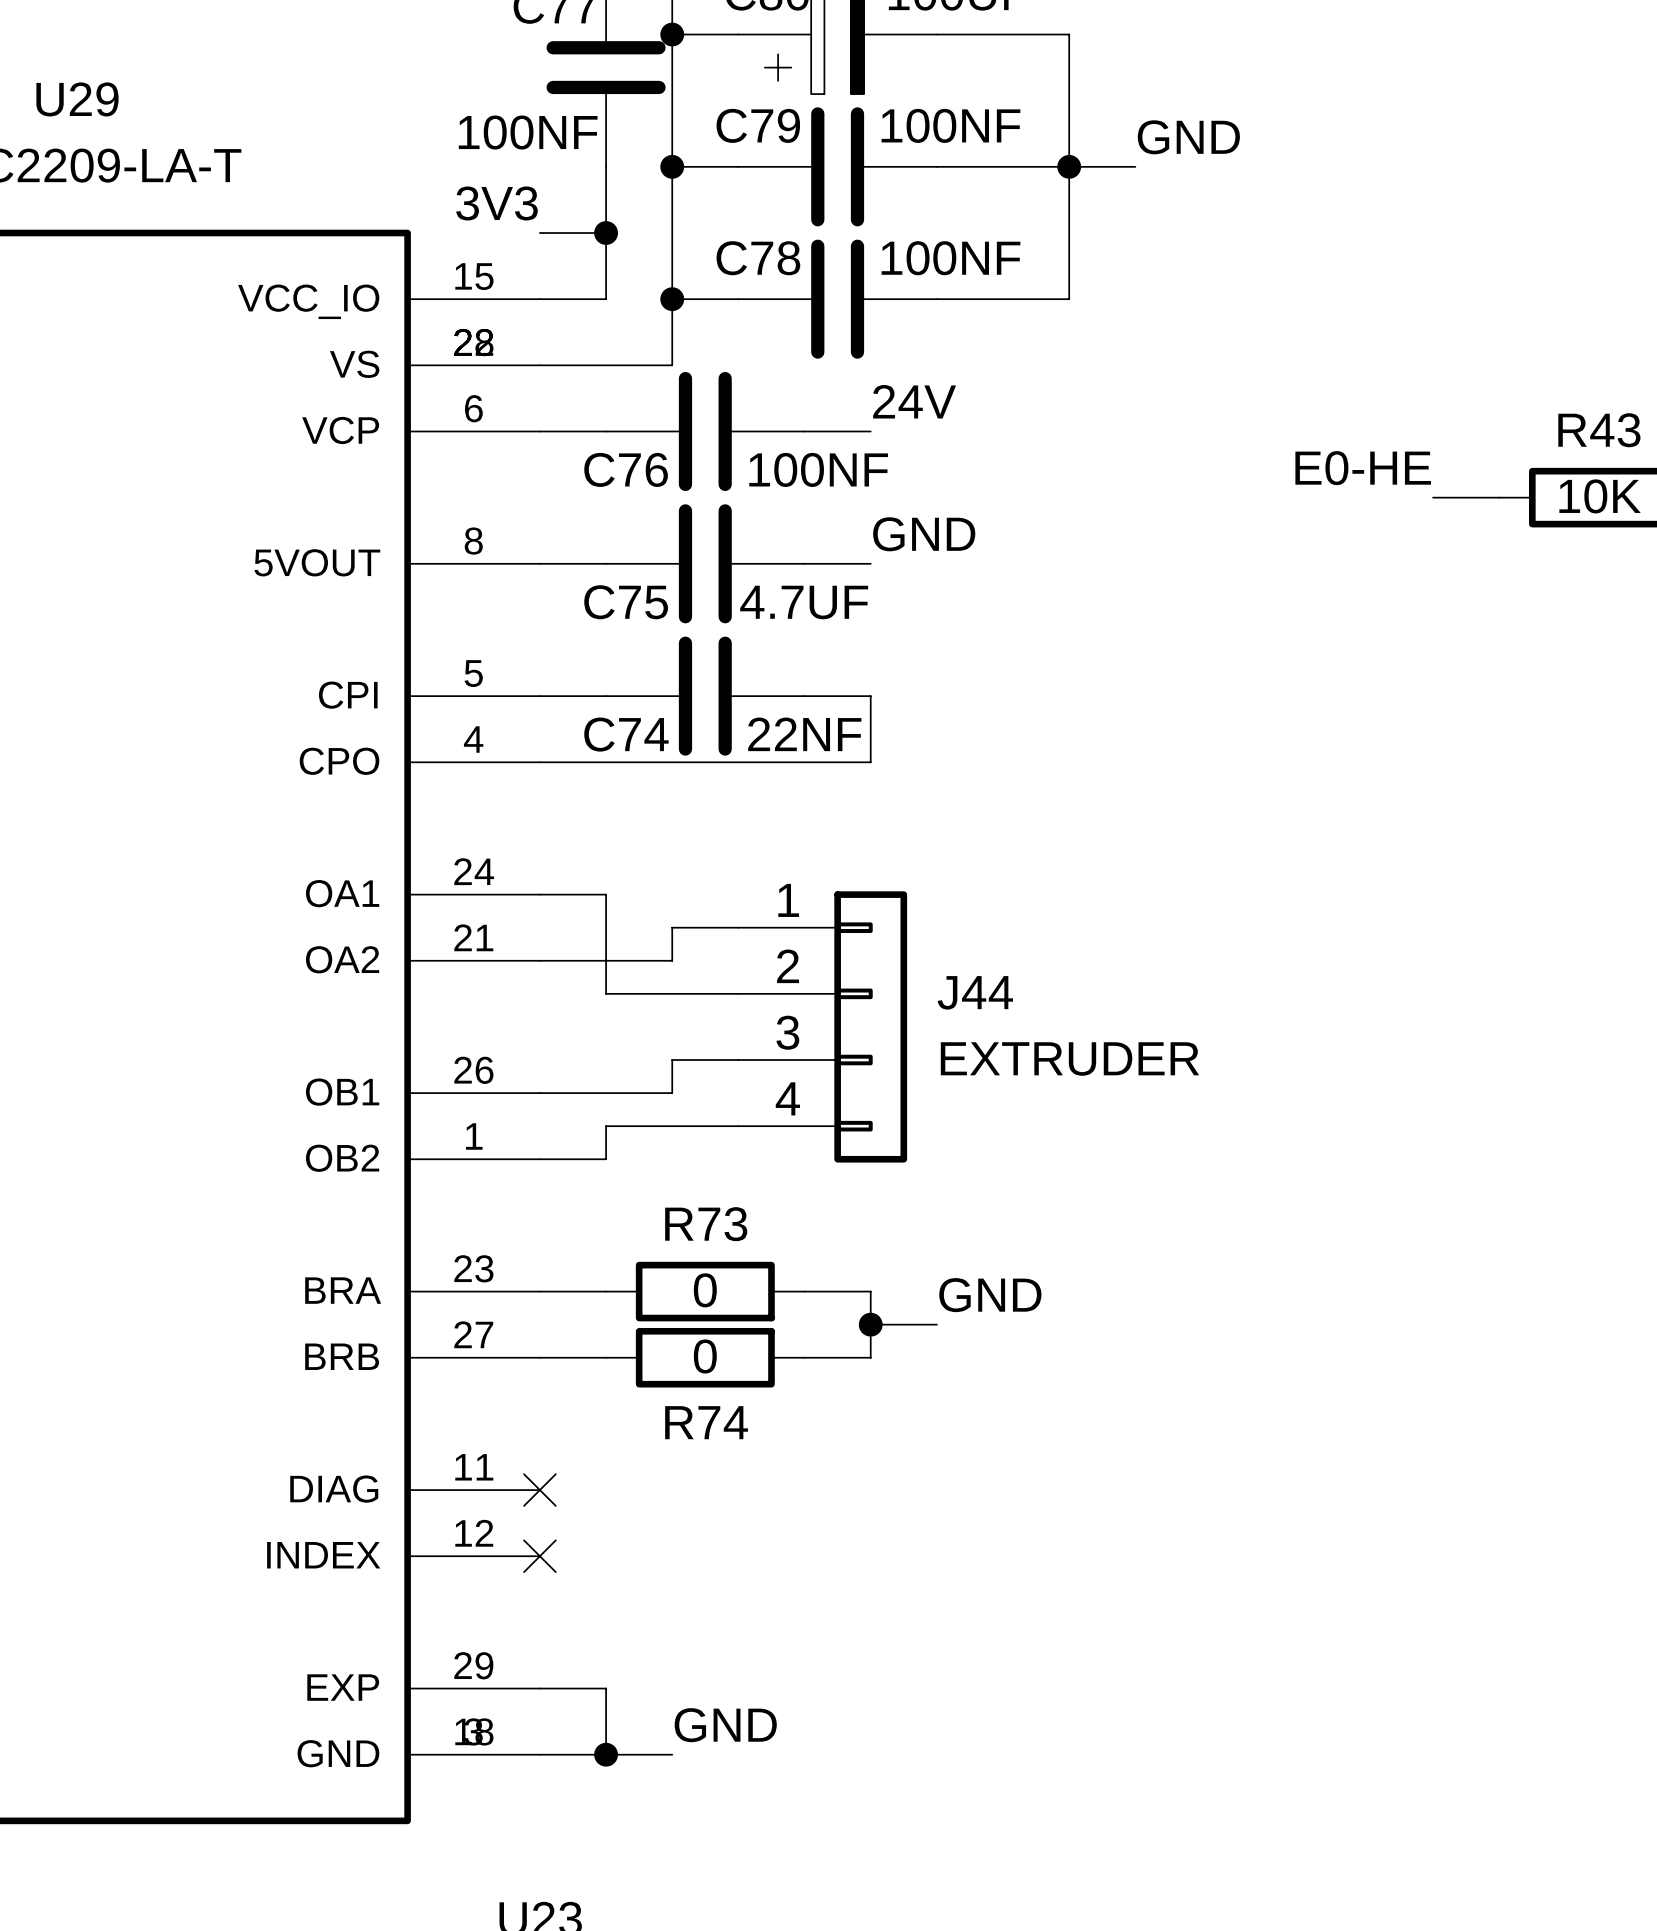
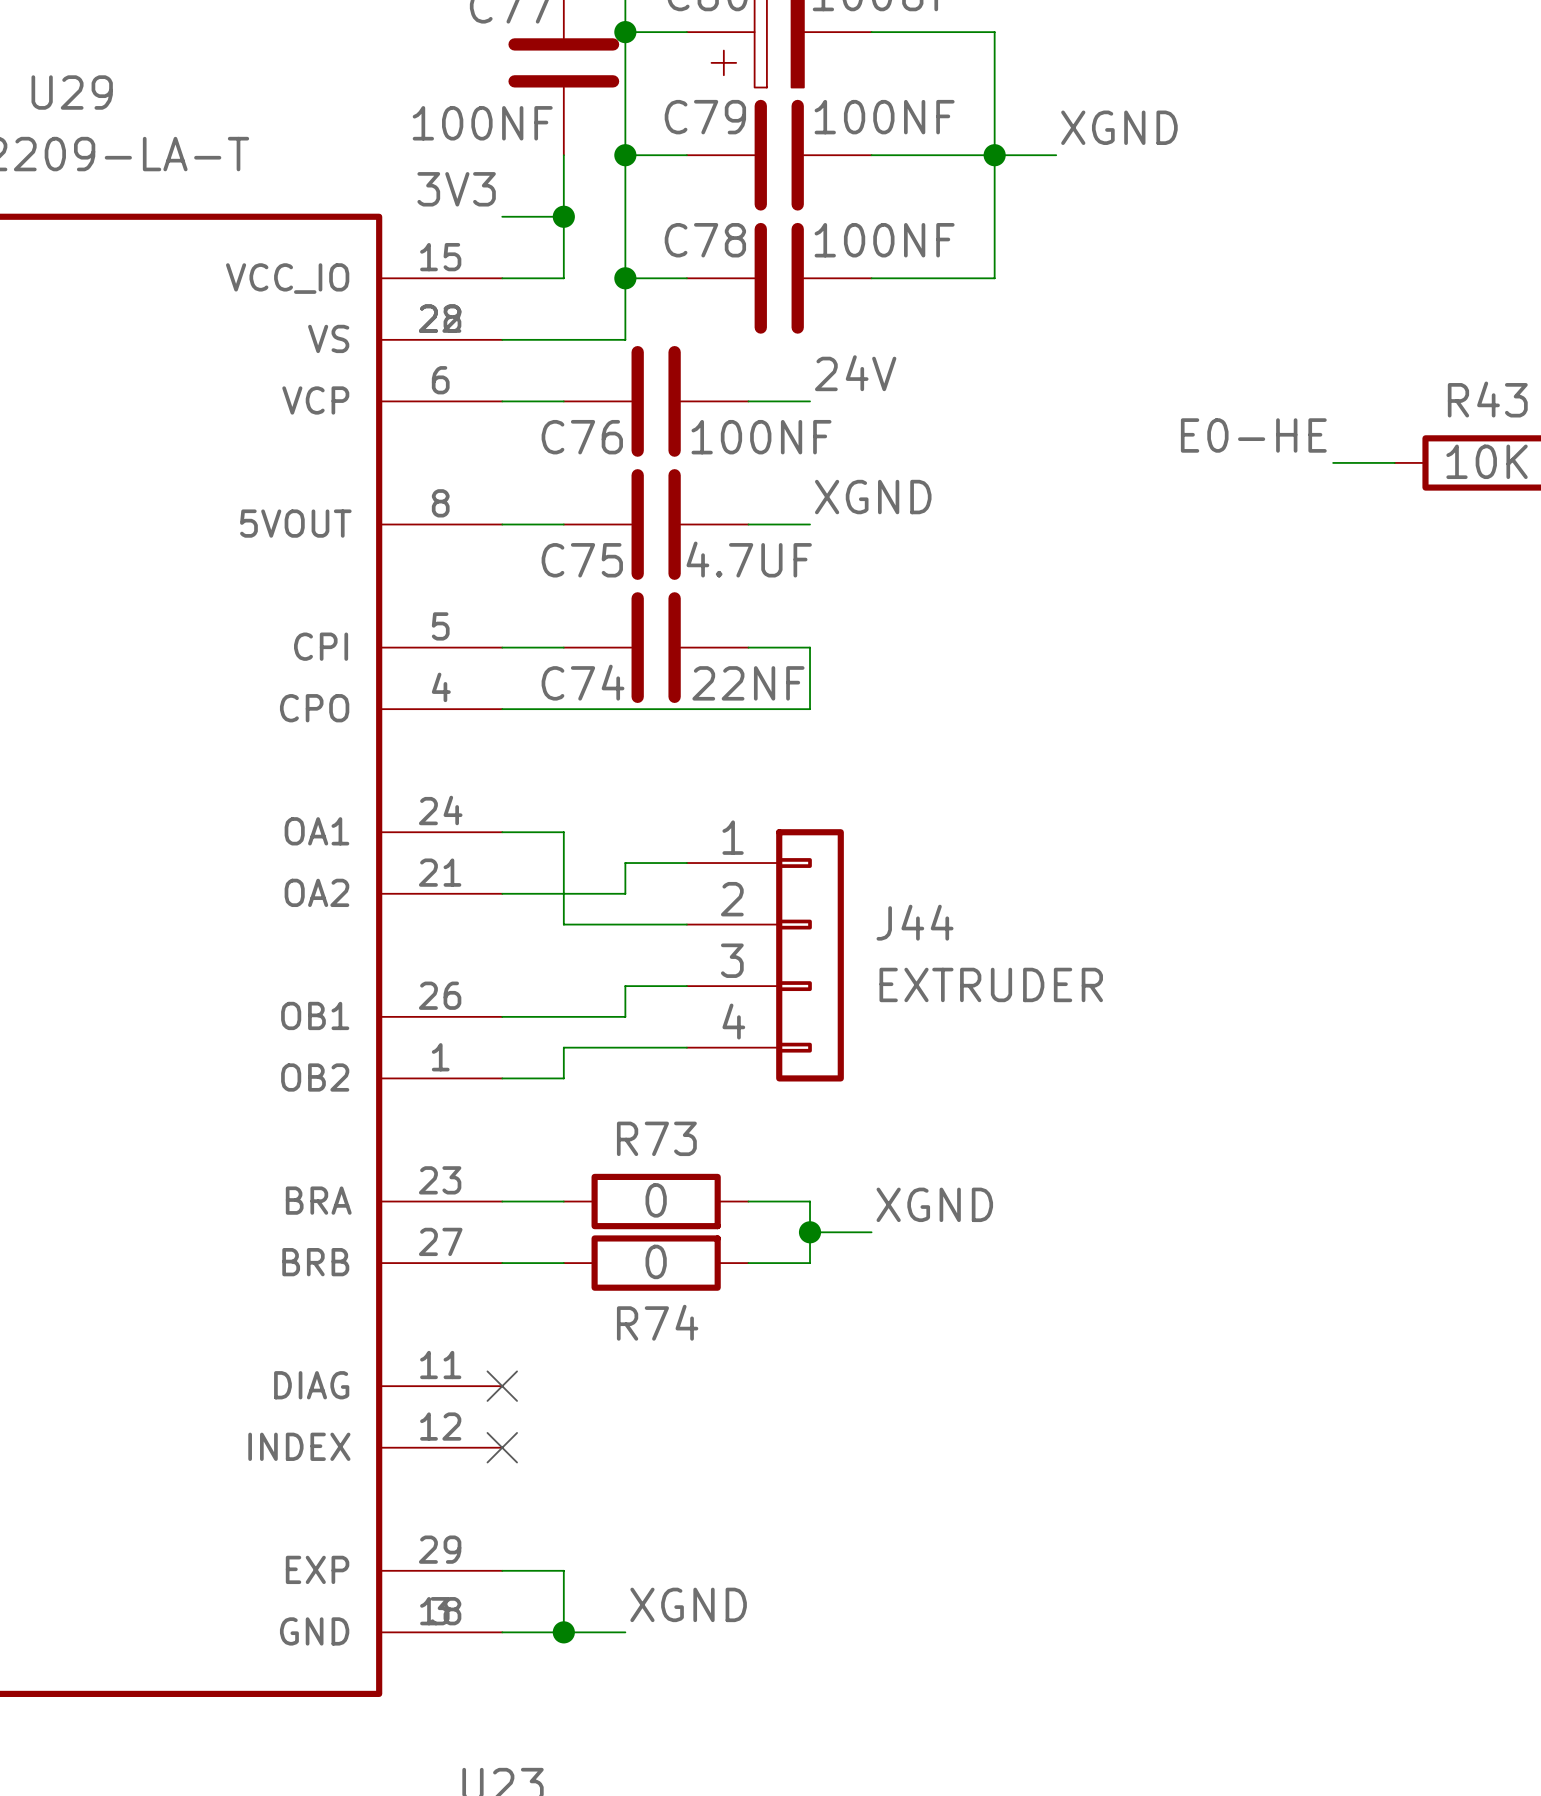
label: GND (1188, 137) -> XGND (1119, 127)
label: GND (924, 534) -> XGND (873, 497)
label: GND (990, 1295) -> XGND (934, 1204)
label: GND (725, 1725) -> XGND (688, 1604)

